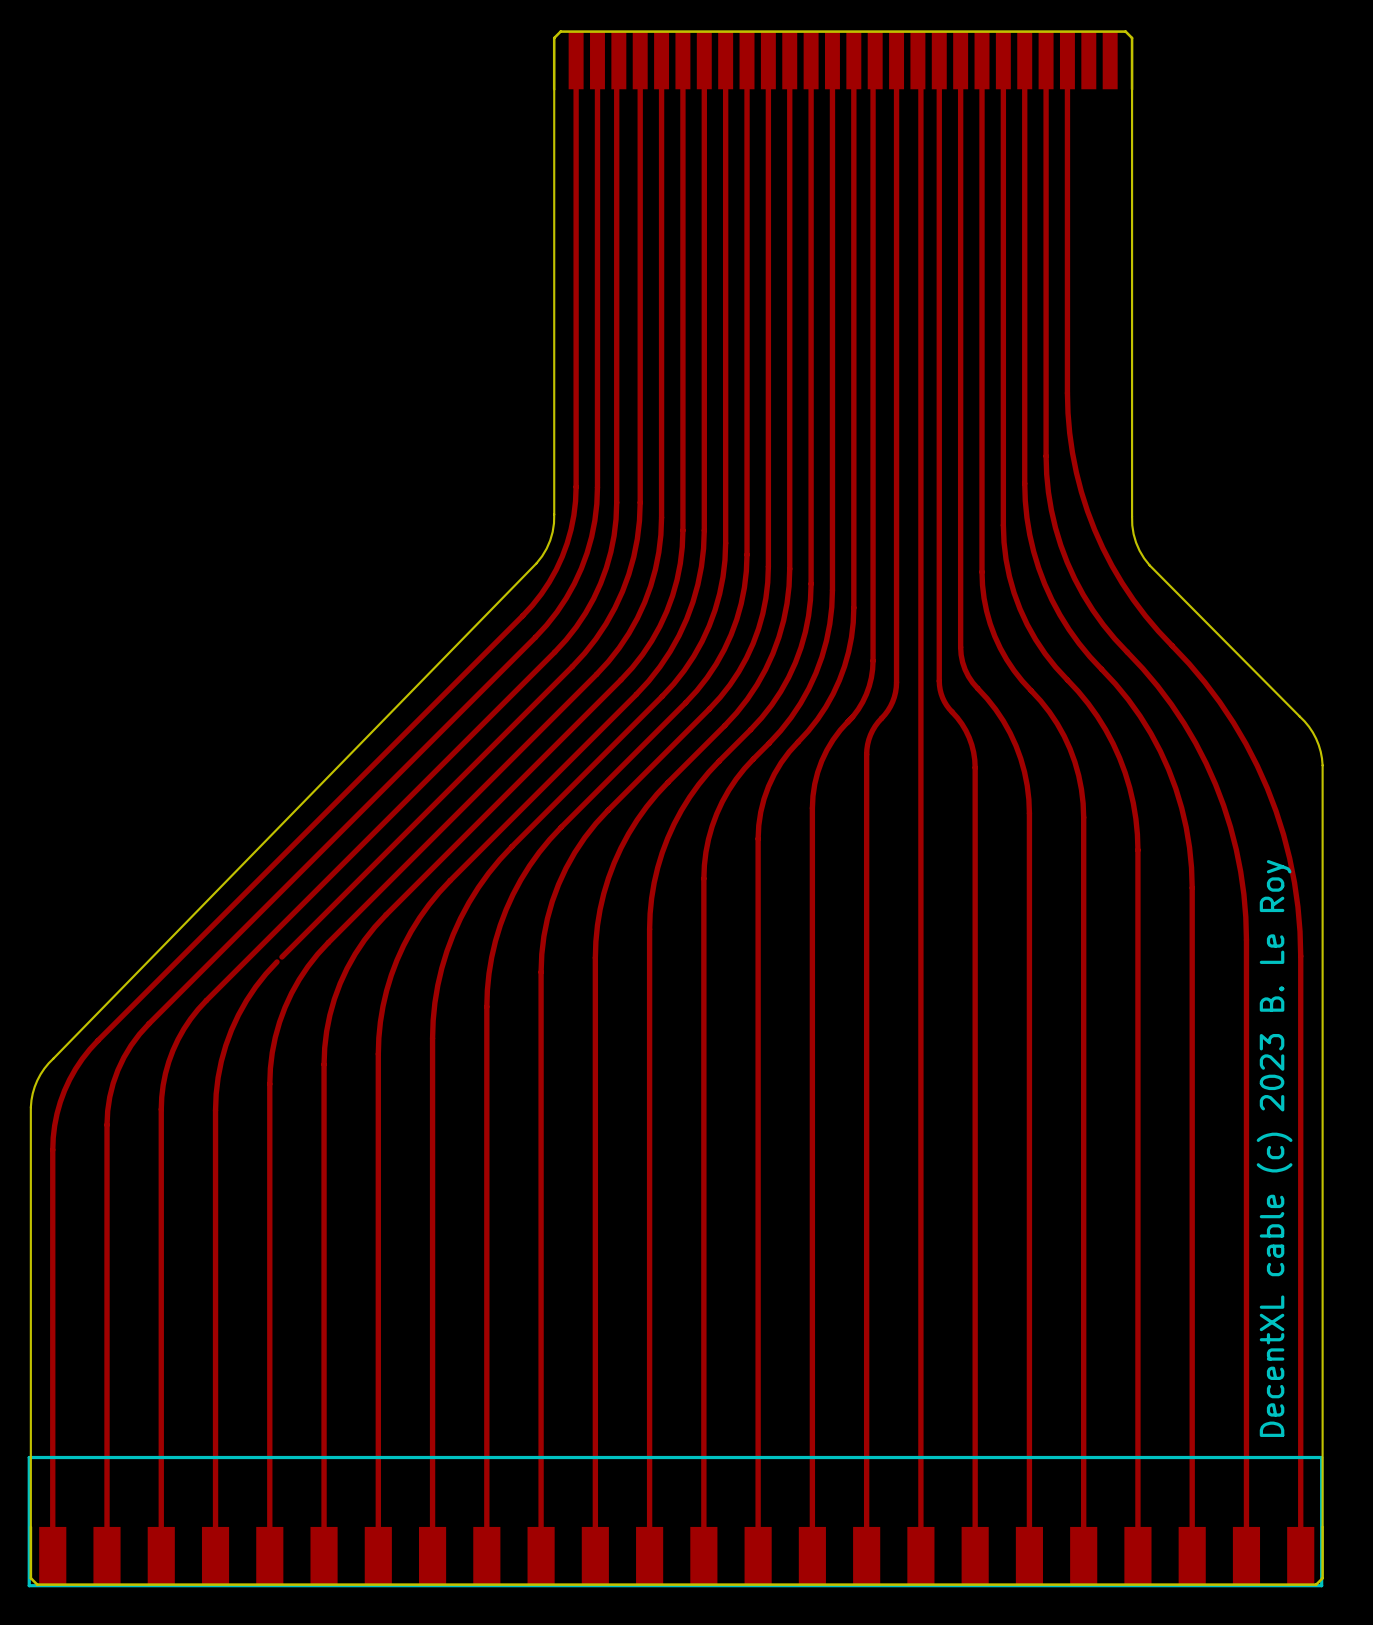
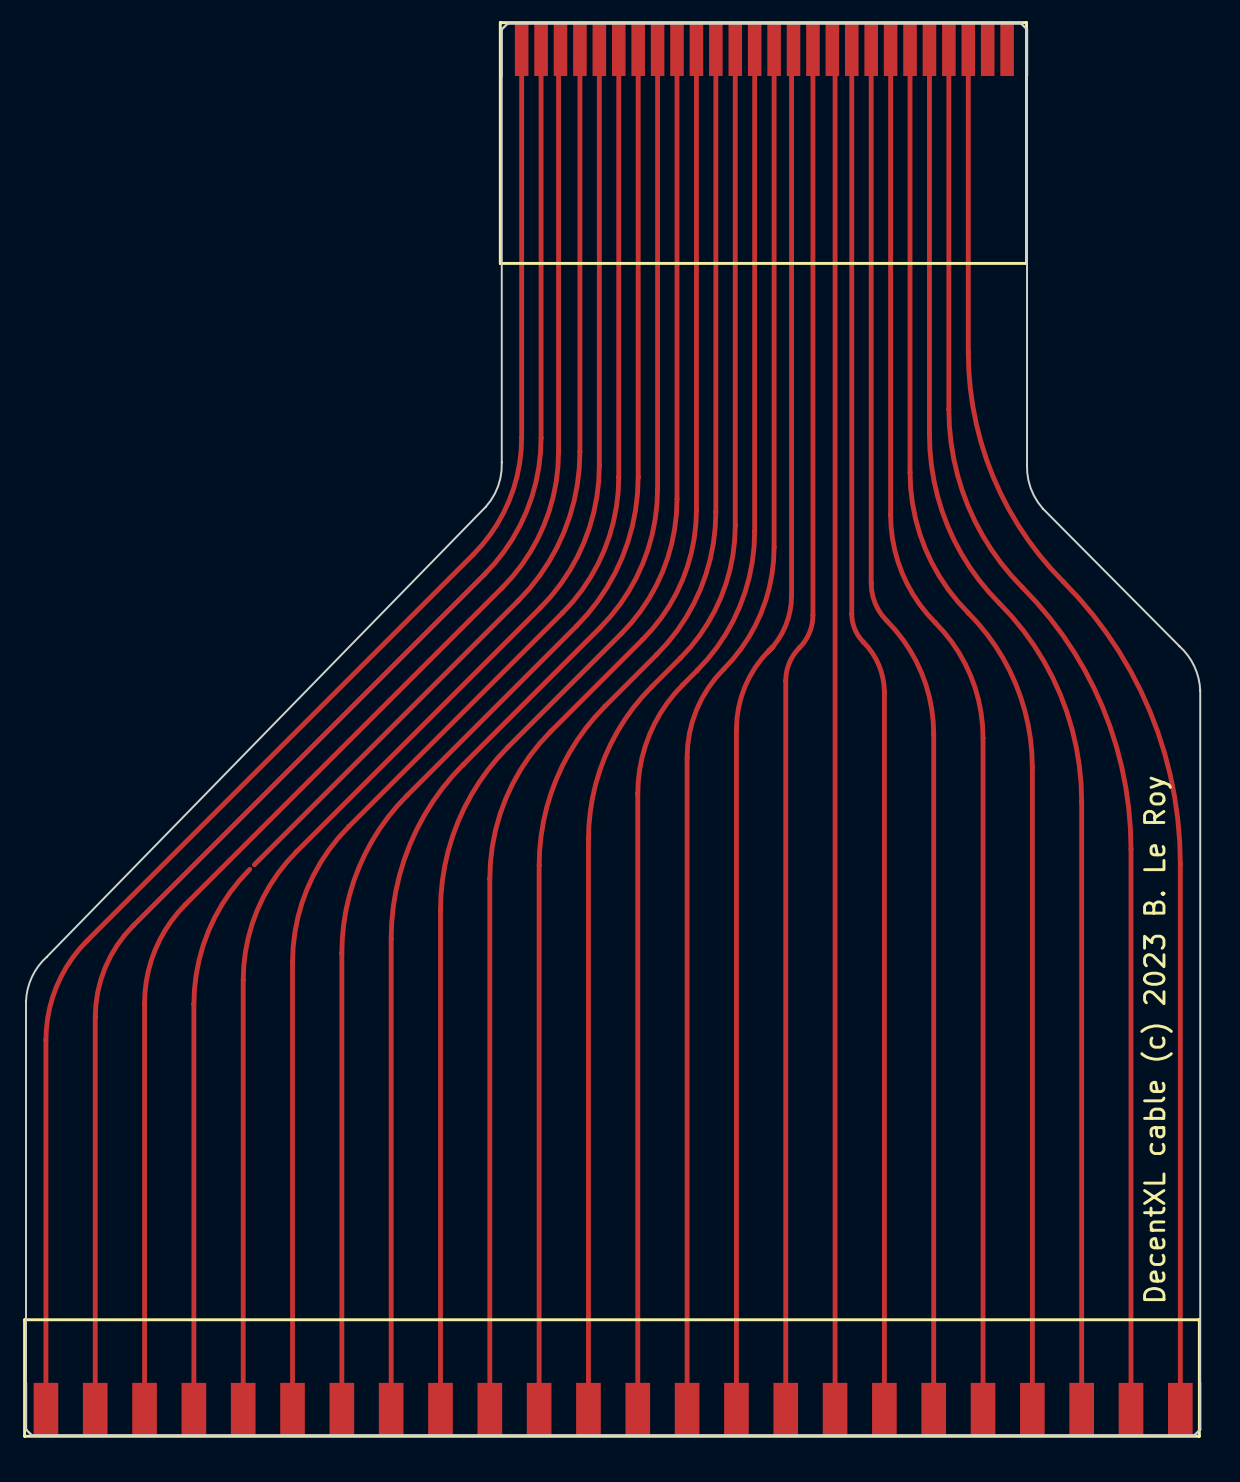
line: none -> (500, 22) (1026, 22) (1026, 263) (500, 263) (500, 22)

